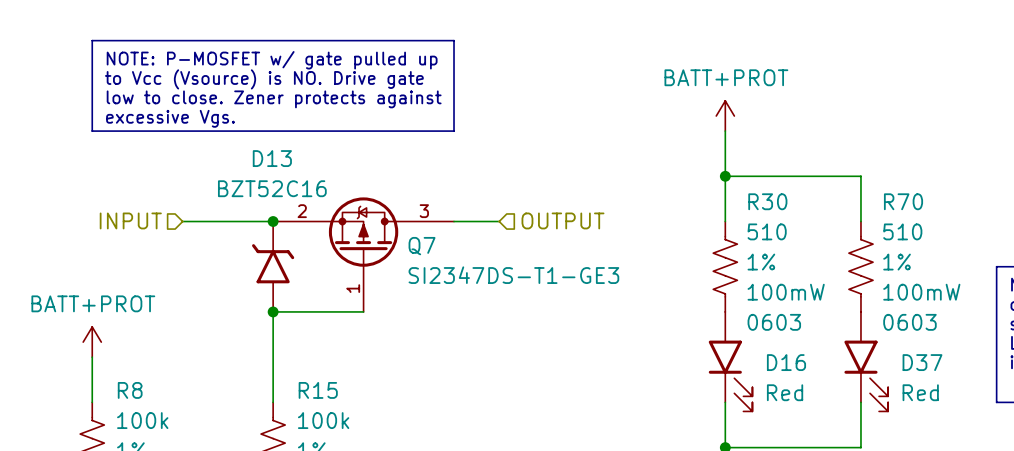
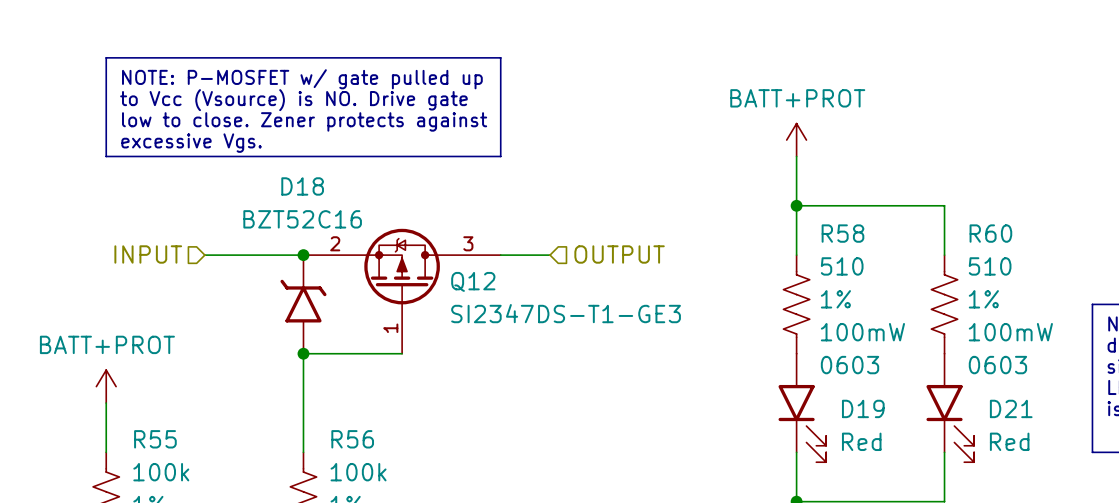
D13 name: D13 (272, 158) -> D18 (302, 186)
R30 name: R30 (767, 201) -> R58 (842, 233)
R70 name: R70 (903, 201) -> R60 (990, 233)
Q7 name: Q7 (422, 246) -> Q12 (473, 281)
D16 name: D16 (786, 362) -> D19 (863, 408)
D37 name: D37 (922, 362) -> D21 (1011, 408)
R8 name: R8 (130, 390) -> R55 (155, 439)
R15 name: R15 (318, 390) -> R56 (352, 439)

